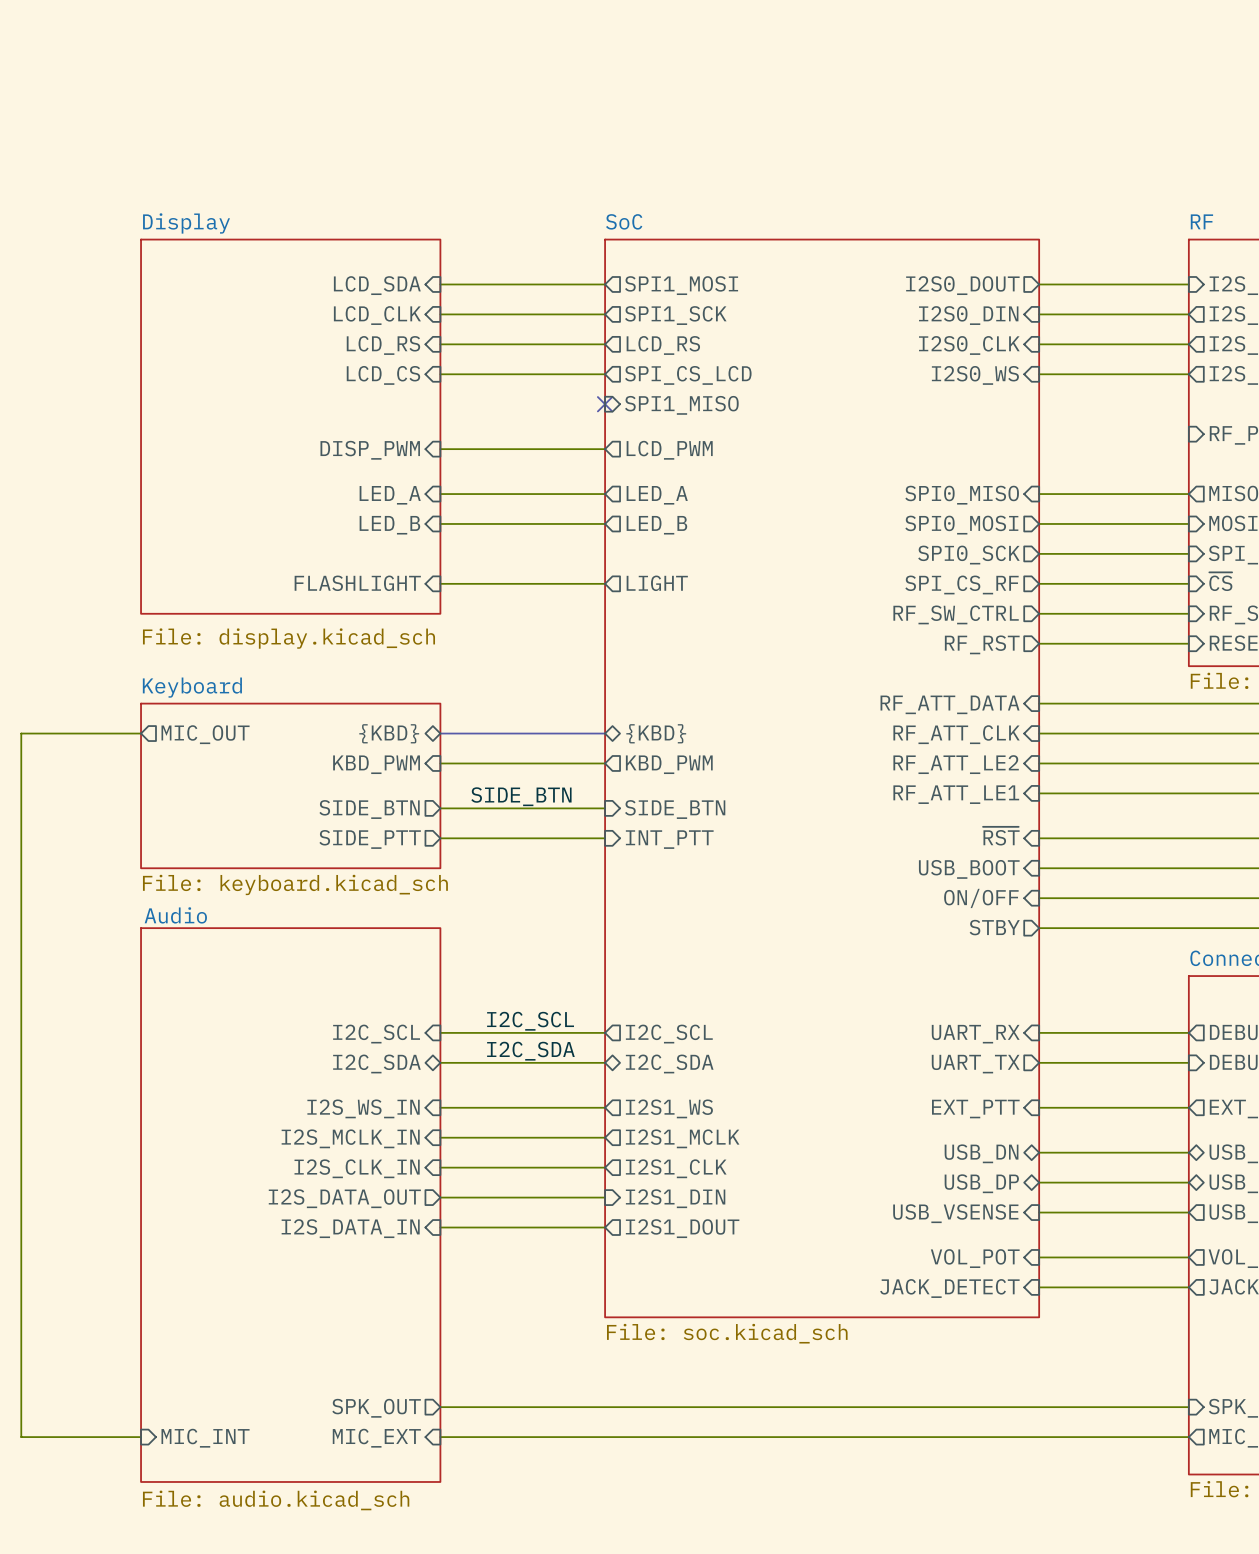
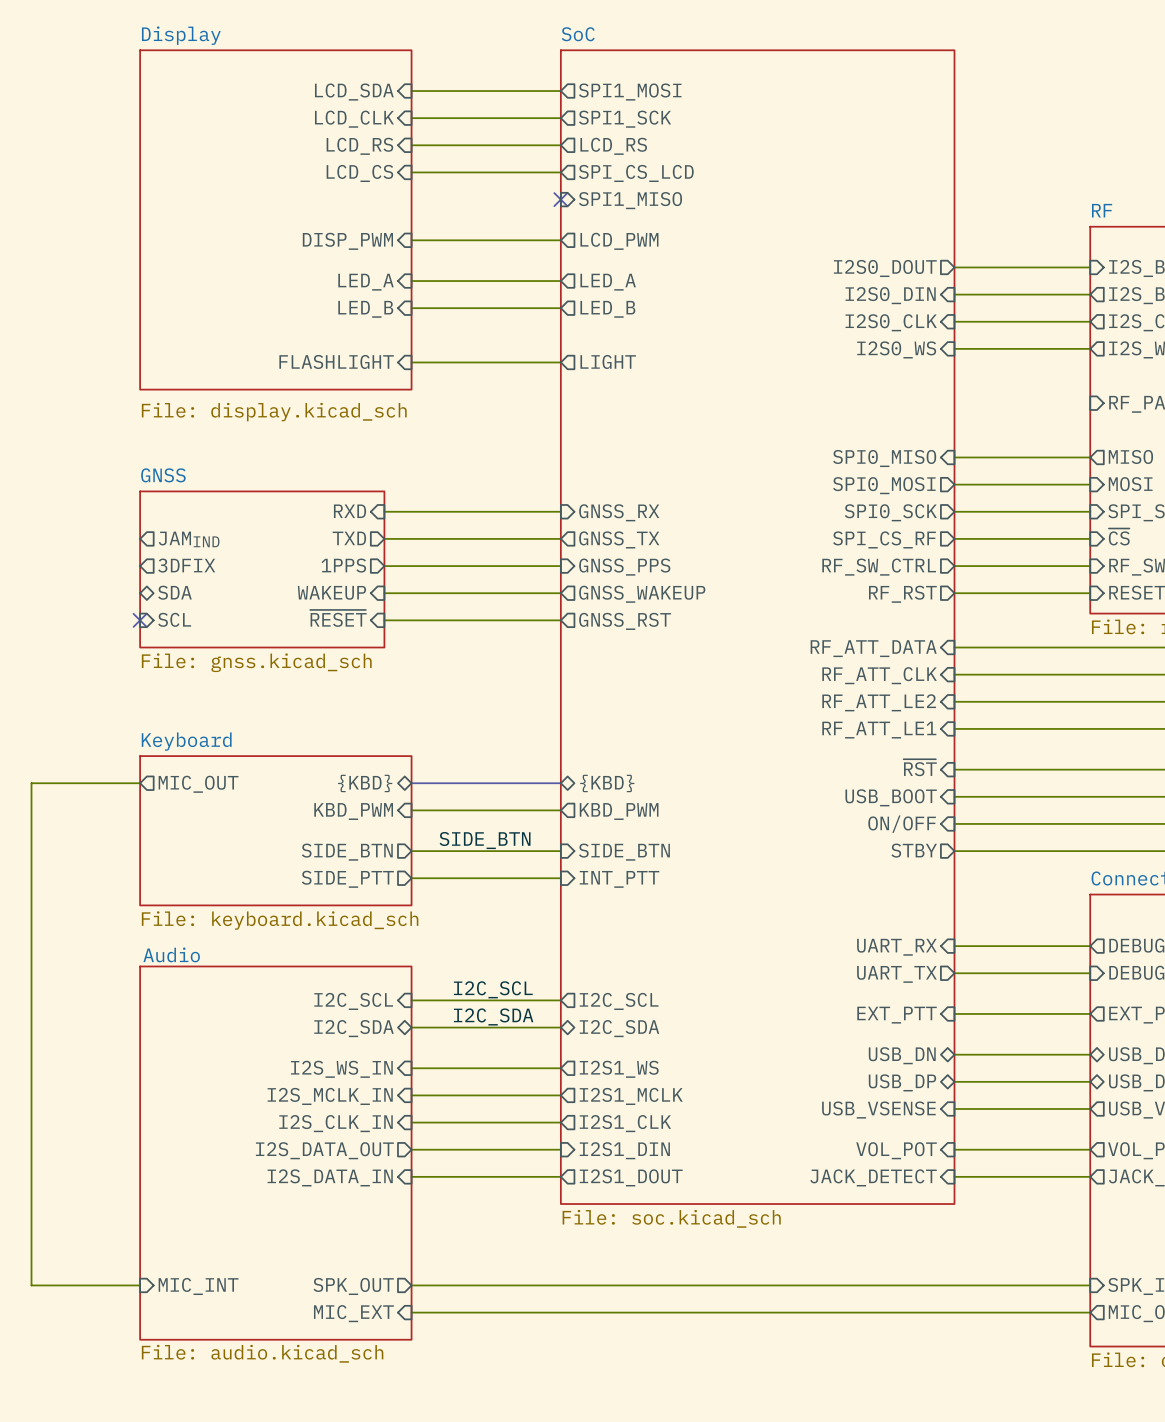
sheet pin: none -> LCD_RS (359, 146)
sheet pin: none -> LCD_RS (613, 146)
no-connect mark: none -> (560, 199)
wire: (440, 284) (605, 284) -> (411, 91) (560, 91)
sheet pin position: LCD_SDA (377, 285) -> LCD_SDA (354, 92)
sheet pin position: SPI1_MOSI (681, 285) -> SPI1_MOSI (630, 92)
sheet pin: none -> LED_A (366, 282)
sheet pin: none -> LED_A (608, 282)
wire: (440, 314) (605, 314) -> (411, 118) (560, 118)
sheet pin position: LCD_CLK (377, 315) -> LCD_CLK (354, 119)
sheet pin position: SPI1_SCK (675, 315) -> SPI1_SCK (625, 119)
sheet pin: none -> LED_B (365, 309)
sheet pin: none -> LED_B (607, 309)
wire: (440, 344) (605, 344) -> (411, 145) (560, 145)
sheet pin: LCD_RS (383, 345) -> none
sheet pin: LCD_RS (663, 345) -> none
wire: (440, 374) (605, 374) -> (411, 172) (560, 172)
sheet pin position: LCD_CS (383, 375) -> LCD_CS (359, 173)
sheet pin position: SPI_CS_LCD (688, 375) -> SPI_CS_LCD (636, 173)
sheet pin: none -> LIGHT (608, 361)
wire: none -> (411, 362) (560, 362)
no-connect mark: (605, 404) -> none
sheet pin position: SPI1_MISO (681, 405) -> SPI1_MISO (630, 200)
sheet Display position: (290, 426) -> (275, 219)
wire: (440, 449) (605, 449) -> (411, 240) (560, 240)
sheet pin position: DISP_PWM (370, 450) -> DISP_PWM (347, 241)
sheet pin position: LCD_PWM (669, 450) -> LCD_PWM (619, 241)
wire: (440, 494) (605, 494) -> (411, 281) (560, 281)
sheet pin: LED_A (390, 495) -> none
sheet pin: LED_A (657, 495) -> none
wire: (440, 523) (605, 523) -> (411, 308) (560, 308)
sheet pin: LED_B (389, 525) -> none
sheet pin: LED_B (656, 525) -> none
sheet pin: none -> RXD (350, 511)
wire: none -> (384, 511) (560, 511)
sheet pin: none -> GNSS_RX (619, 512)
sheet pin position: FLASHLIGHT (357, 583) -> FLASHLIGHT (336, 361)
sheet pin: none -> TXD (349, 538)
wire: none -> (384, 538) (411, 538)
sheet pin: LIGHT (657, 583) -> GNSS_TX (619, 539)
sheet pin: none -> JAMIND (189, 539)
sheet pin: none -> 3DFIX (186, 565)
sheet pin: none -> 1PPS (343, 565)
wire: none -> (384, 566) (560, 566)
sheet pin: none -> GNSS_PPS (624, 567)
sheet GNSS: none -> File: gnss.kicad_sch (262, 569)
sheet pin: none -> SDA (174, 592)
sheet pin: none -> WAKEUP (331, 592)
wire: none -> (384, 593) (560, 593)
sheet pin: none -> GNSS_WAKEUP (642, 594)
sheet pin: none -> ~{RESET} (338, 618)
no-connect mark: none -> (140, 620)
sheet pin: none -> SCL (174, 619)
wire: none -> (384, 620) (560, 620)
sheet pin: none -> GNSS_RST (625, 621)
sheet SoC: none -> File: soc.kicad_sch (757, 627)
wire: (141, 733) (21, 733) (21, 853) -> (140, 783) (31, 783)
sheet pin: {KBD} (389, 733) -> none
bus: (440, 733) (605, 733) -> (411, 783) (560, 783)
sheet pin: {KBD} (656, 733) -> none
sheet pin position: MIC_OUT (205, 734) -> MIC_OUT (198, 784)
wire: (440, 763) (605, 763) -> none
sheet pin: KBD_PWM (376, 764) -> none
sheet pin: KBD_PWM (669, 764) -> none
sheet SoC: File: soc.kicad_sch (822, 778) -> none
sheet Keyboard position: (290, 785) -> (275, 830)
label position: SIDE_BTN (521, 796) -> SIDE_BTN (485, 840)
wire: (440, 808) (605, 808) -> none
sheet pin: SIDE_BTN (369, 809) -> none
sheet pin: SIDE_BTN (675, 809) -> none
wire: (440, 838) (605, 838) -> (411, 1000) (560, 1000)
sheet pin position: SIDE_PTT (370, 839) -> SIDE_PTT (347, 879)
sheet pin position: INT_PTT (669, 839) -> INT_PTT (619, 879)
sheet pin: none -> {KBD} (365, 783)
sheet pin: none -> {KBD} (607, 783)
sheet pin: none -> KBD_PWM (353, 811)
sheet pin: none -> KBD_PWM (619, 811)
sheet pin: none -> SIDE_BTN (347, 852)
sheet pin: none -> SIDE_BTN (624, 852)
label position: I2C_SCL (530, 1021) -> I2C_SCL (493, 989)
wire: (440, 1032) (605, 1032) -> (411, 851) (560, 851)
sheet pin position: I2C_SCL (376, 1034) -> I2C_SCL (353, 1001)
sheet pin position: I2C_SCL (669, 1034) -> I2C_SCL (619, 1001)
label position: I2C_SDA (530, 1051) -> I2C_SDA (493, 1016)
wire: (440, 1062) (605, 1062) -> (411, 878) (560, 878)
sheet pin position: I2C_SDA (376, 1063) -> I2C_SDA (354, 1028)
sheet pin position: I2C_SDA (669, 1063) -> I2C_SDA (619, 1028)
wire: (440, 1107) (605, 1107) -> (411, 810) (560, 810)
sheet pin: I2S_WS_IN (363, 1108) -> none
sheet pin: I2S1_WS (669, 1108) -> none
wire: (440, 1137) (605, 1137) -> (411, 1027) (560, 1027)
sheet pin: I2S_MCLK_IN (350, 1138) -> none
sheet pin: I2S1_MCLK (682, 1138) -> none
sheet pin: I2S_CLK_IN (357, 1168) -> I2S_WS_IN (341, 1069)
sheet pin: I2S1_CLK (676, 1168) -> I2S1_WS (619, 1069)
sheet pin shape: output (344, 1198) -> input (330, 1096)
sheet pin: I2S_DATA_OUT (344, 1198) -> I2S_MCLK_IN (330, 1096)
sheet pin shape: input (675, 1198) -> output (631, 1096)
sheet pin: I2S1_DIN (675, 1198) -> I2S1_MCLK (631, 1096)
sheet Audio: File: audio.kicad_sch (290, 1205) -> none
sheet pin: I2S_DATA_IN (350, 1228) -> I2S_CLK_IN (336, 1123)
sheet pin: I2S1_DOUT (682, 1228) -> I2S1_CLK (625, 1123)
wire: none -> (411, 1149) (560, 1149)
sheet pin: none -> I2S_DATA_OUT (324, 1150)
sheet pin: none -> I2S1_DIN (624, 1150)
sheet Audio: none -> File: audio.kicad_sch (275, 1153)
wire: none -> (411, 1176) (560, 1176)
sheet pin: none -> I2S_DATA_IN (330, 1177)
sheet pin: none -> I2S1_DOUT (631, 1177)
wire: (21, 1407) (21, 1437) (141, 1437) -> (31, 1285) (140, 1285)
sheet pin position: MIC_INT (205, 1438) -> MIC_INT (198, 1286)

